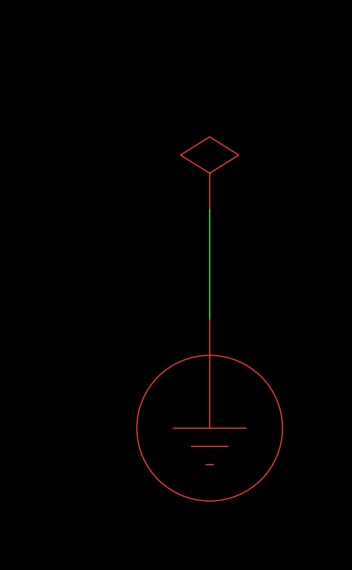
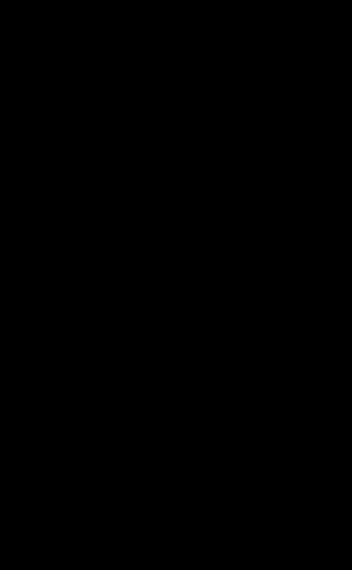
power symbol: (209, 173) -> none
wire: (209, 209) (209, 318) -> none
power symbol: (209, 409) -> none

